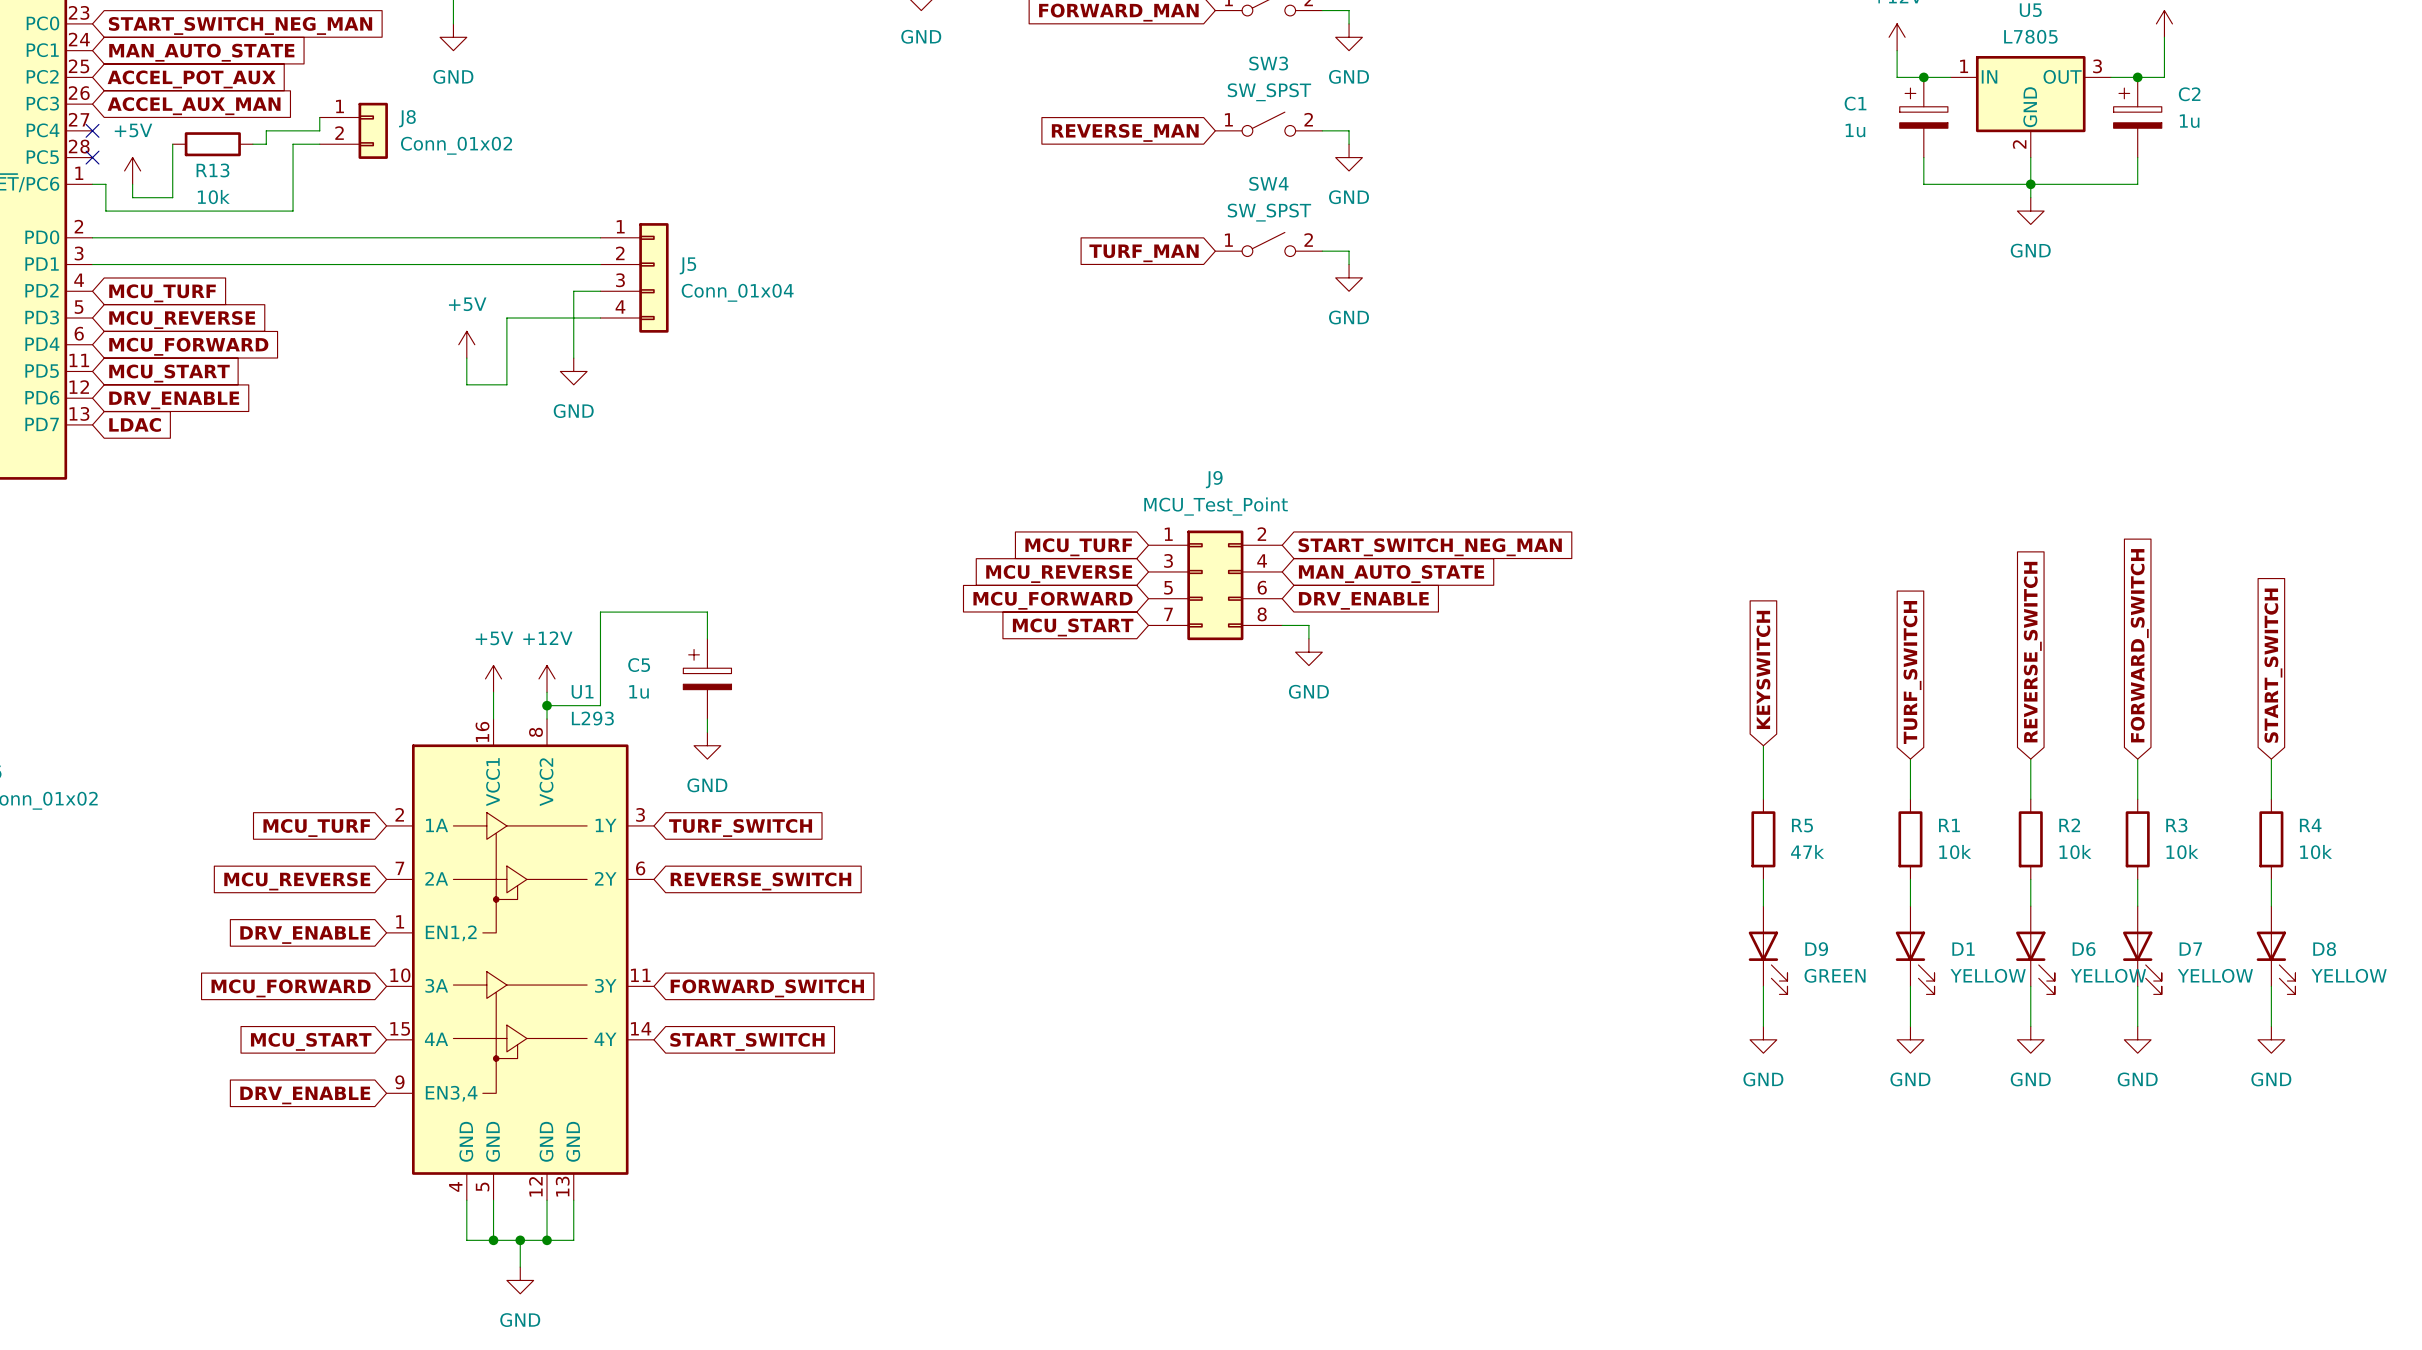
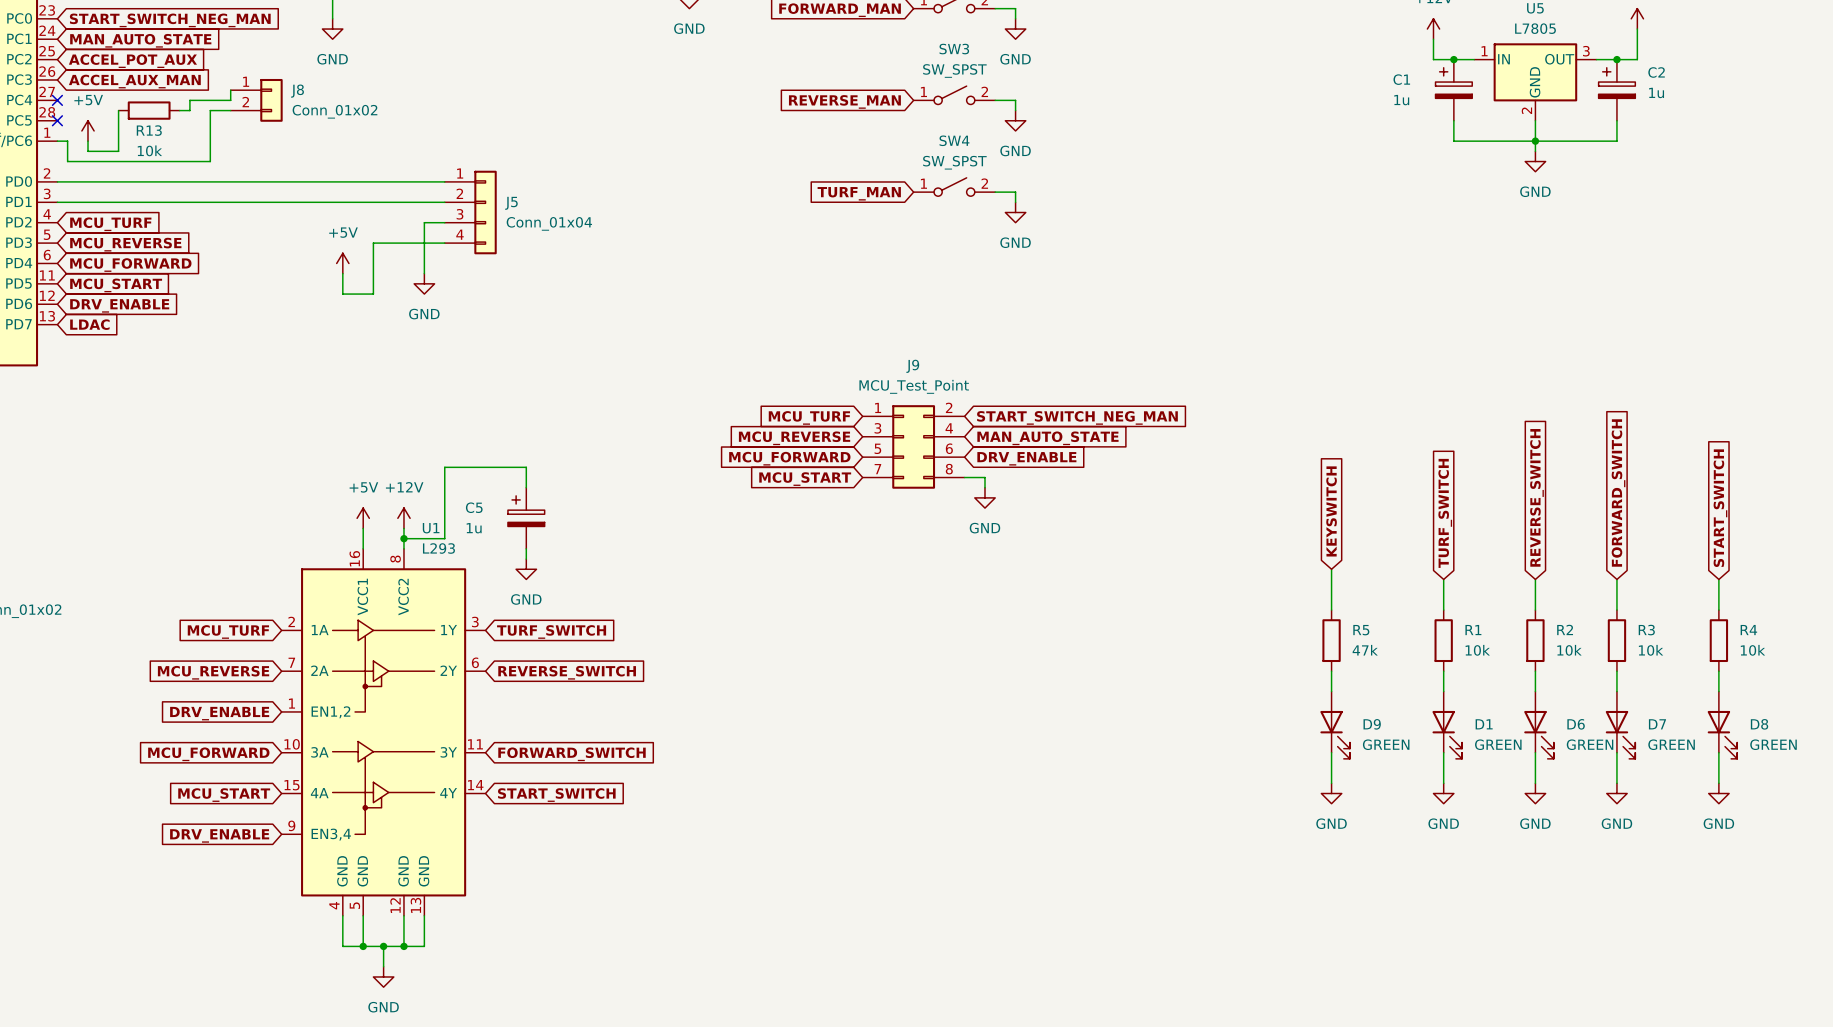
D1 value: YELLOW (1988, 975) -> GREEN (1498, 744)
D6 value: YELLOW (2108, 975) -> GREEN (1590, 744)
D7 value: YELLOW (2215, 975) -> GREEN (1671, 744)
D8 value: YELLOW (2349, 975) -> GREEN (1773, 744)

